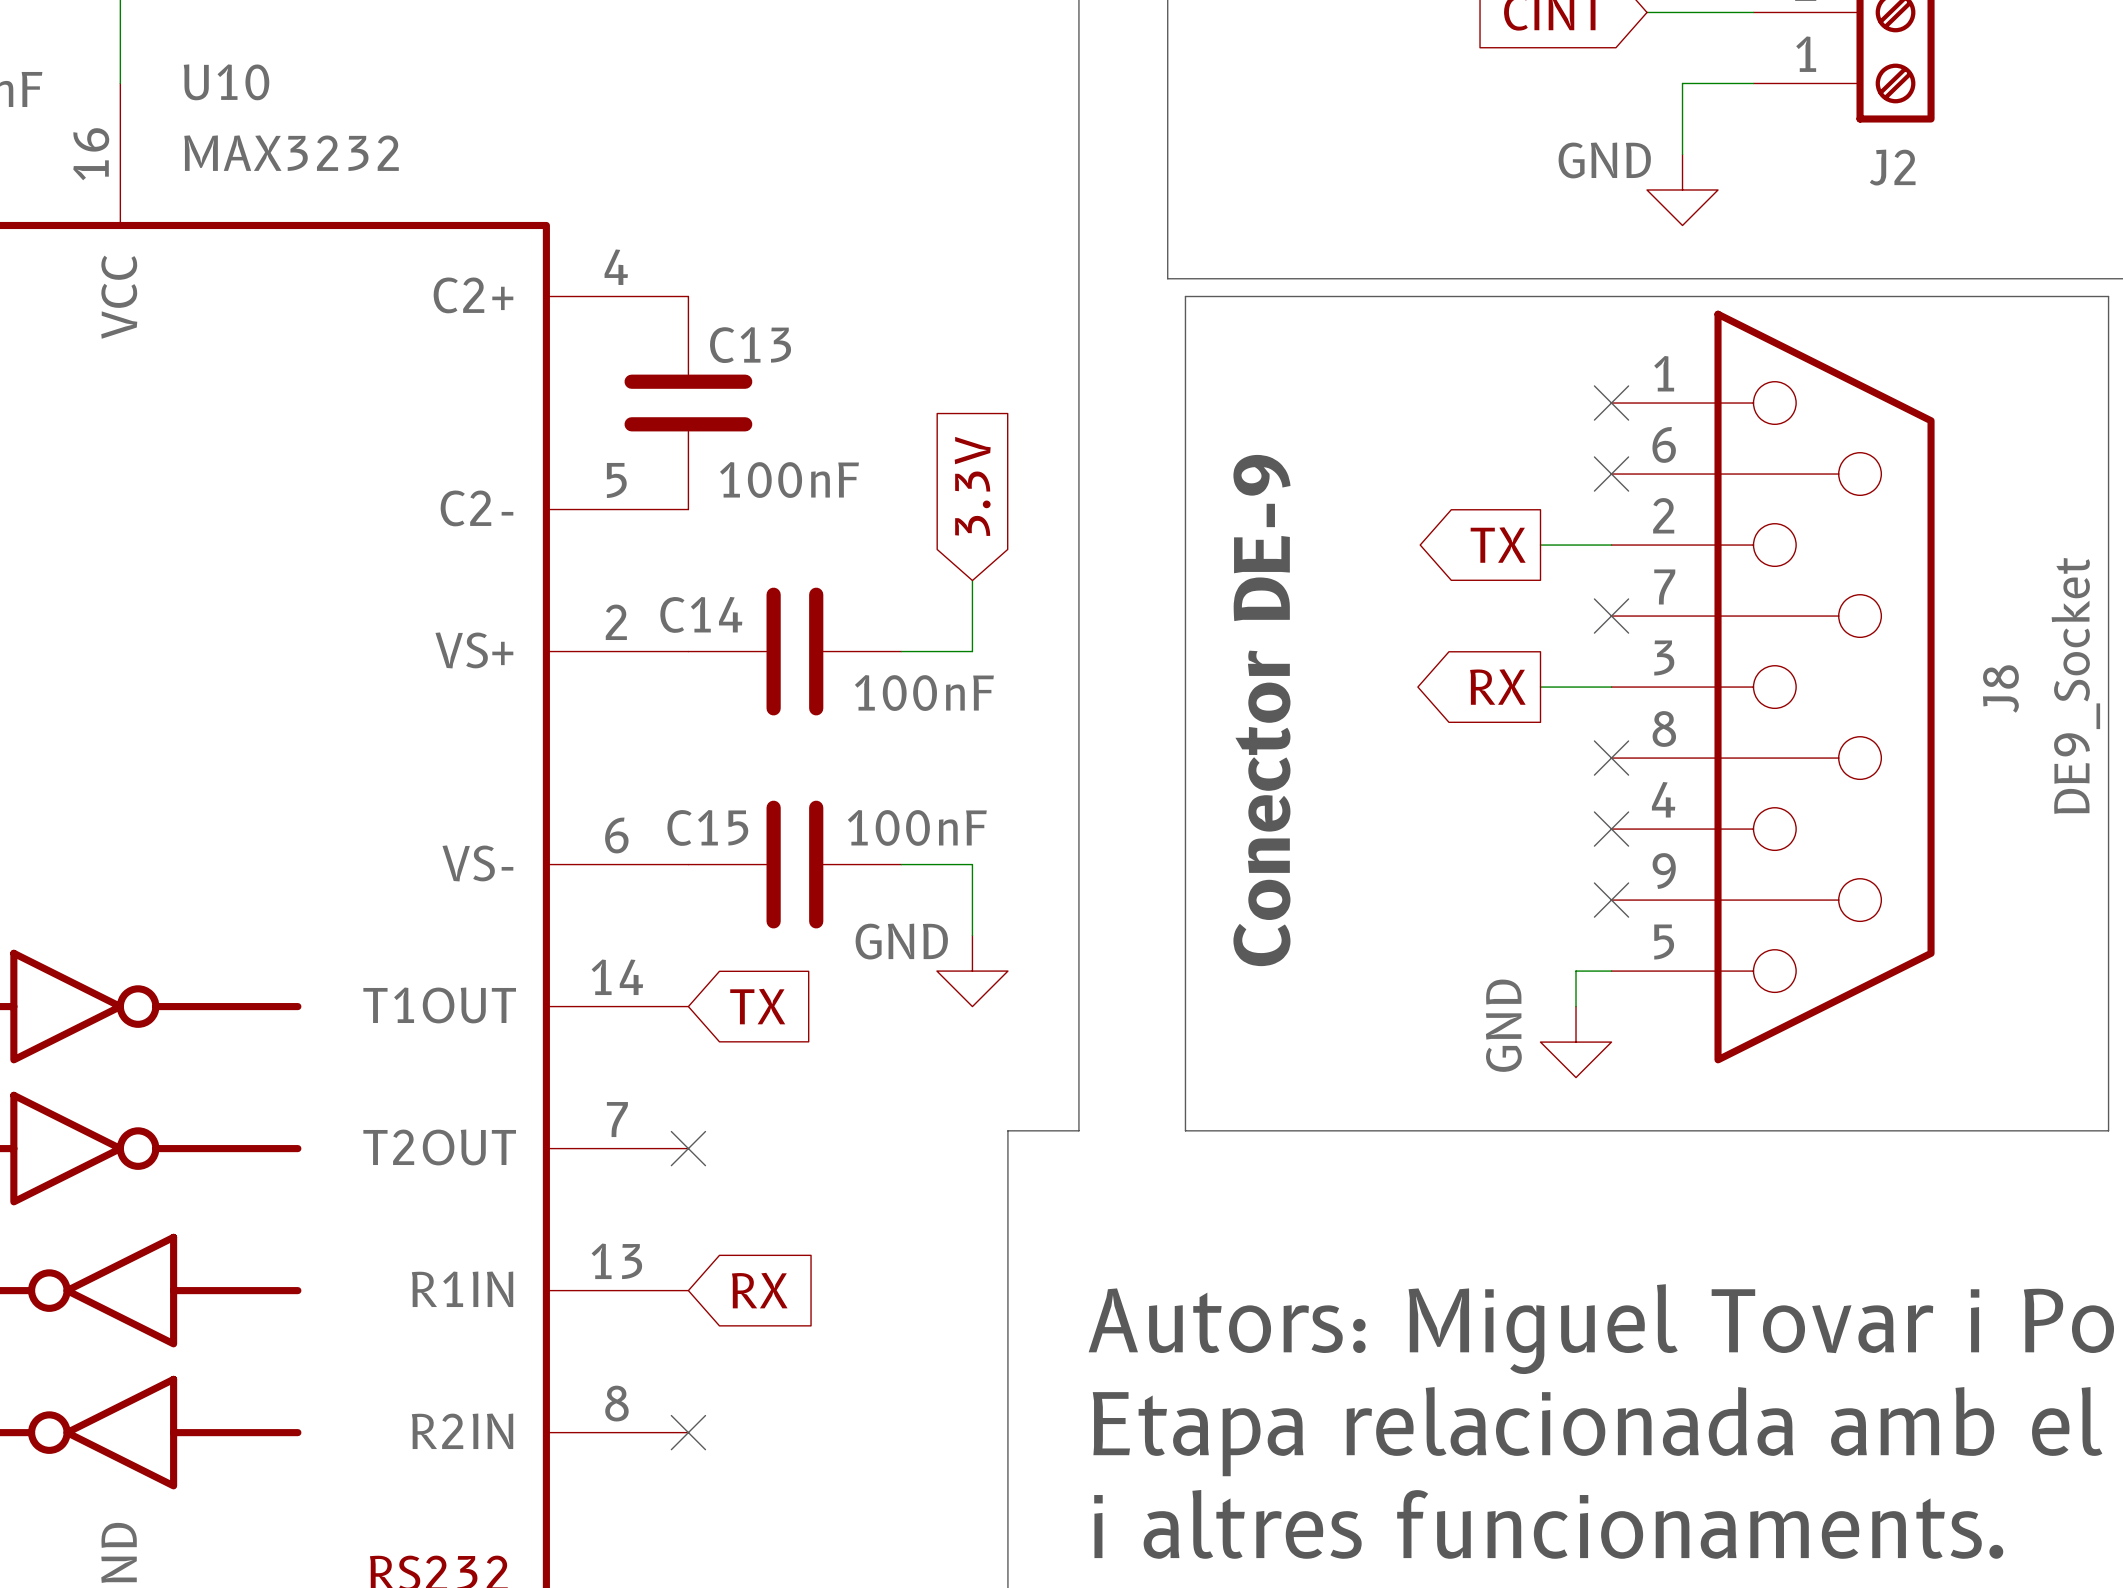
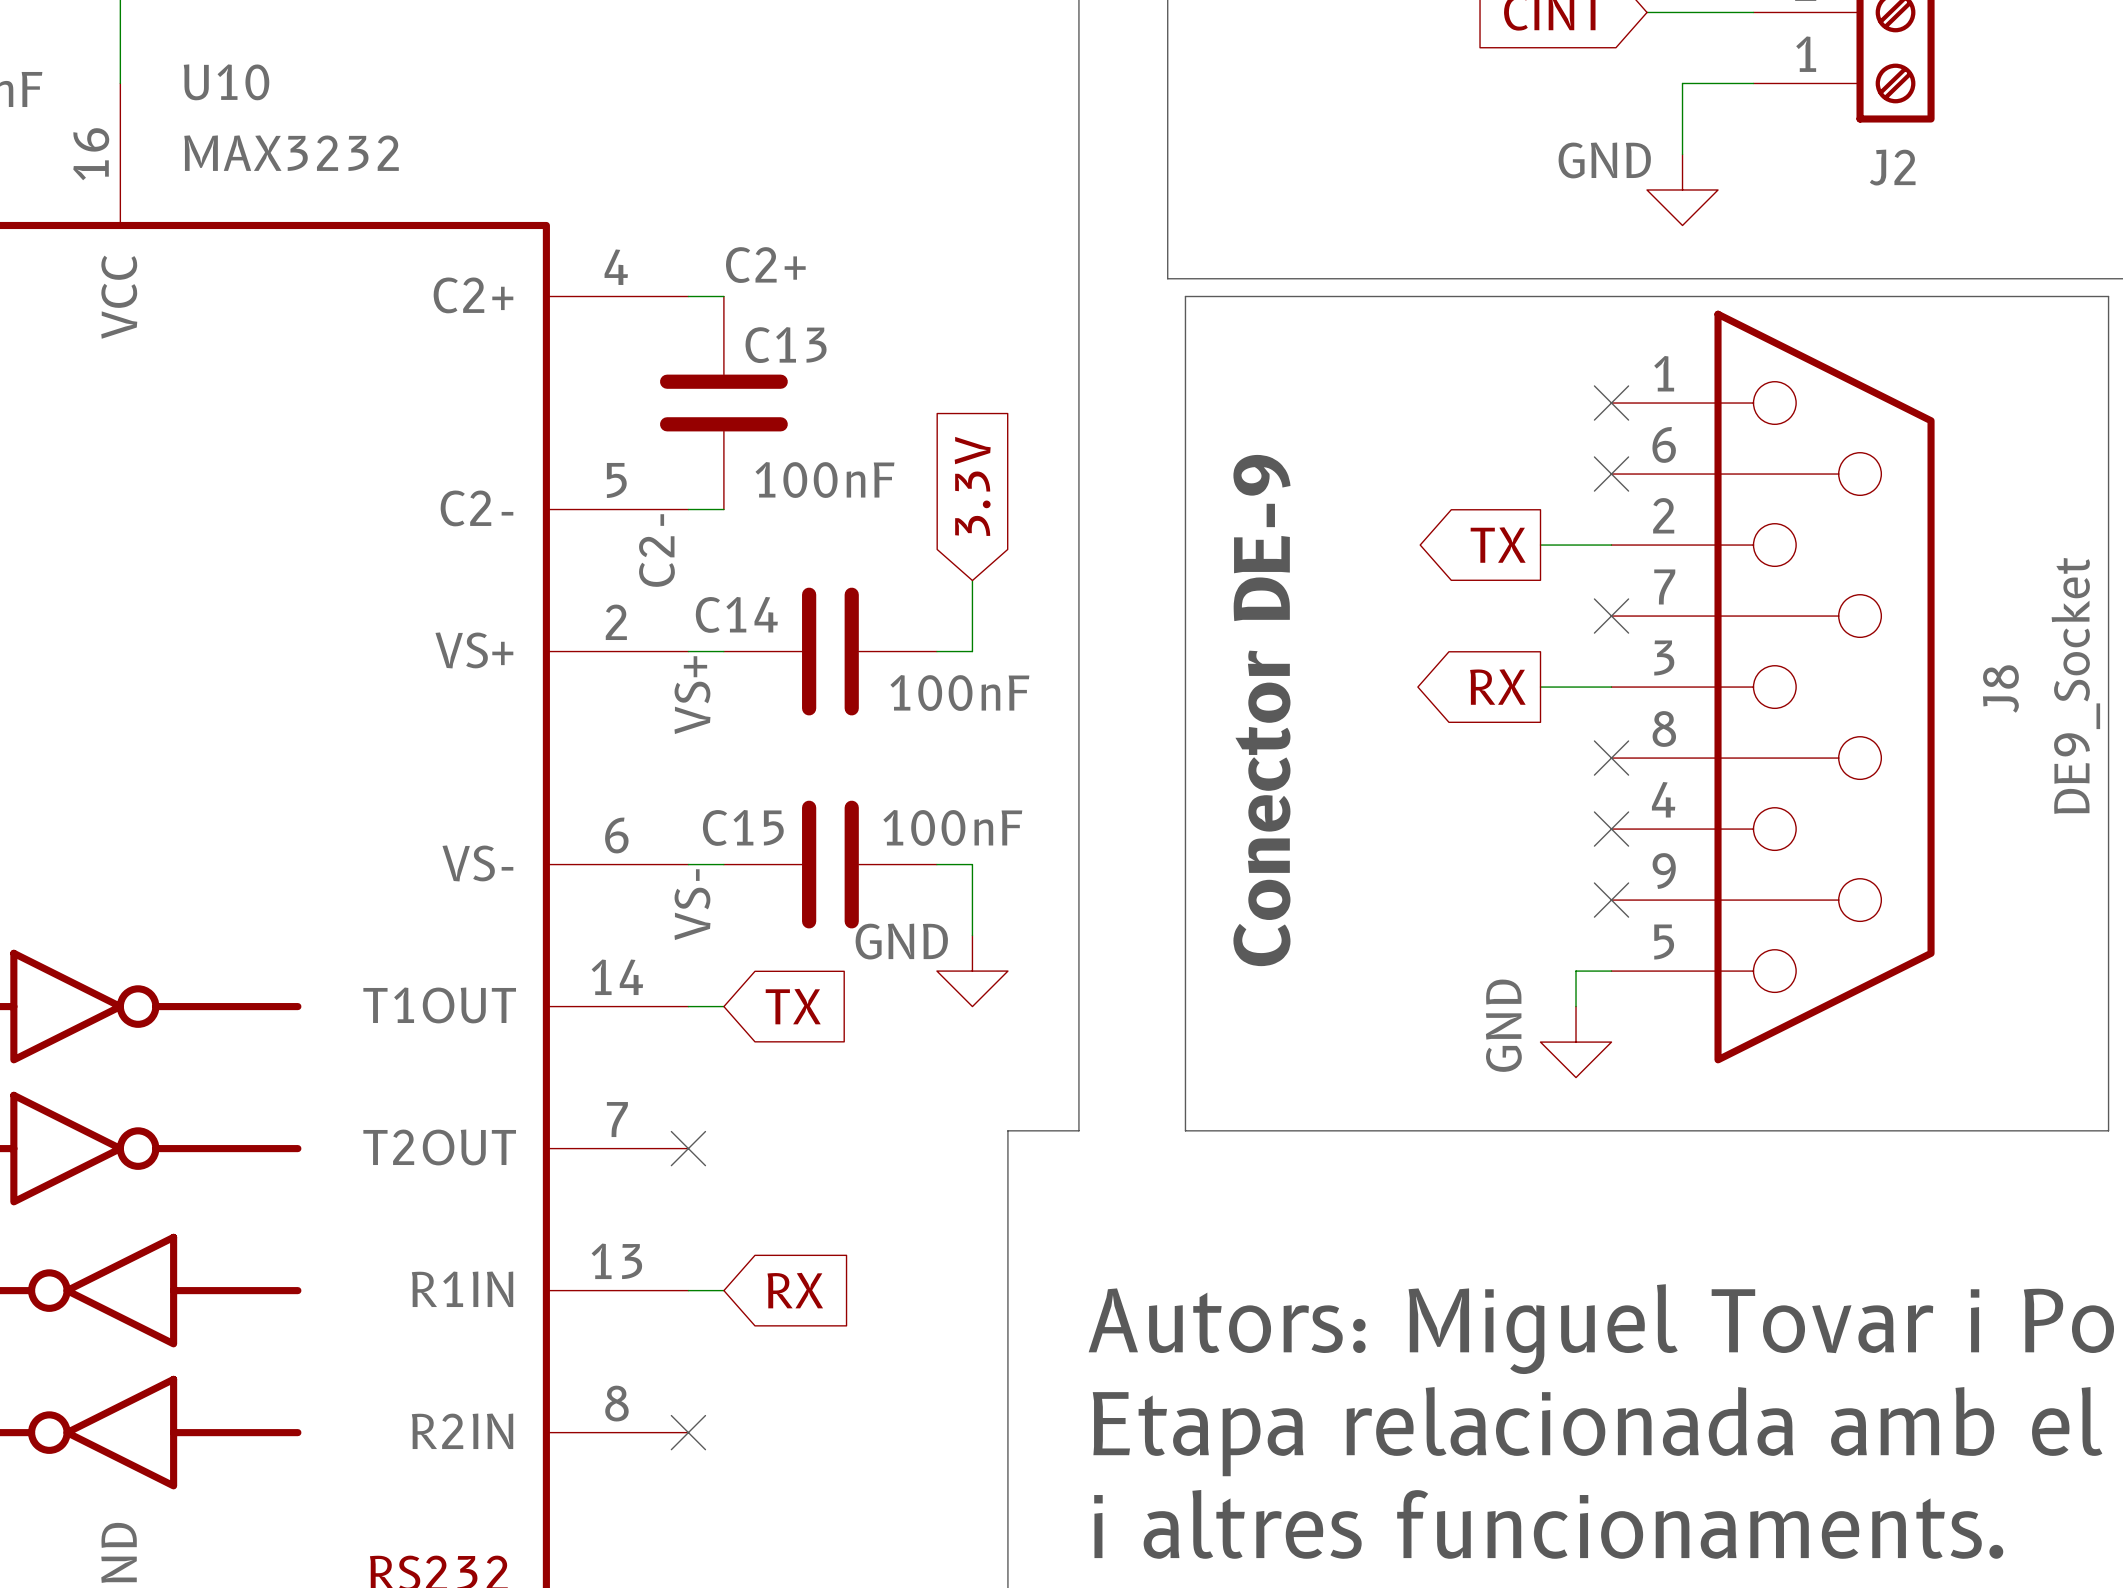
label: none -> C2+ (765, 265)
wire: none -> (688, 296) (723, 296)
C13 position: (688, 403) -> (723, 403)
wire: none -> (688, 509) (723, 509)
label: none -> C2- (656, 550)
C14 position: (794, 651) -> (830, 651)
label: none -> VS+ (692, 695)
C15 position: (794, 864) -> (830, 864)
label: none -> VS- (692, 904)
wire: none -> (688, 1006) (723, 1006)
global label position: TX (757, 1006) -> TX (793, 1006)
wire: none -> (688, 1290) (723, 1290)
global label position: RX (759, 1290) -> RX (795, 1290)

